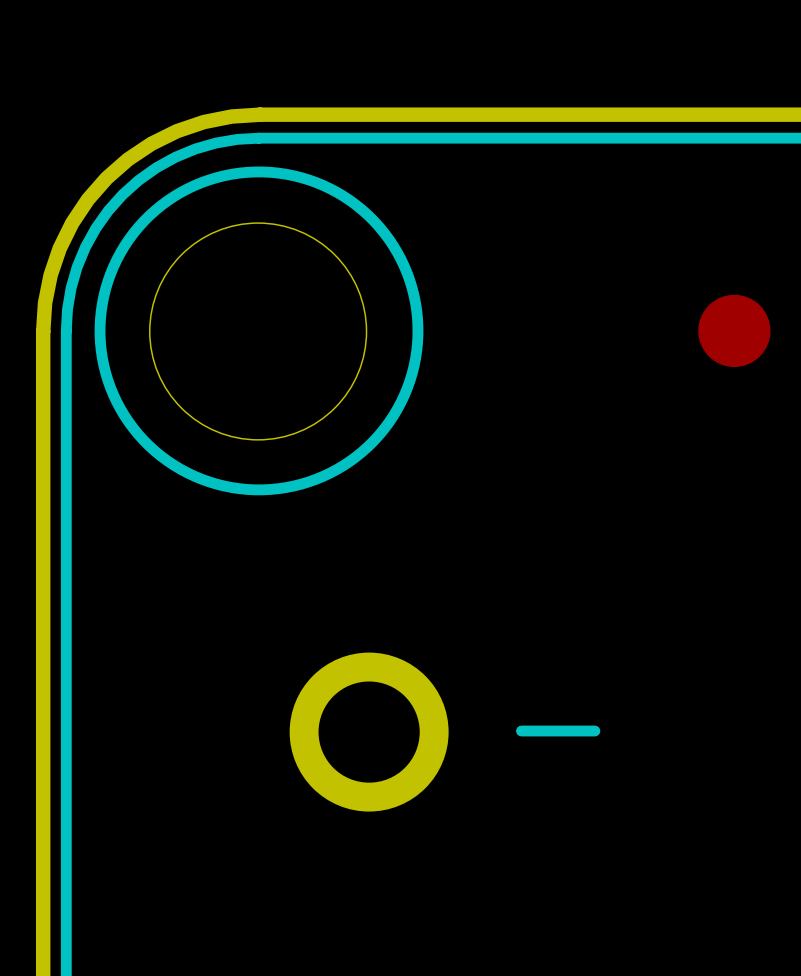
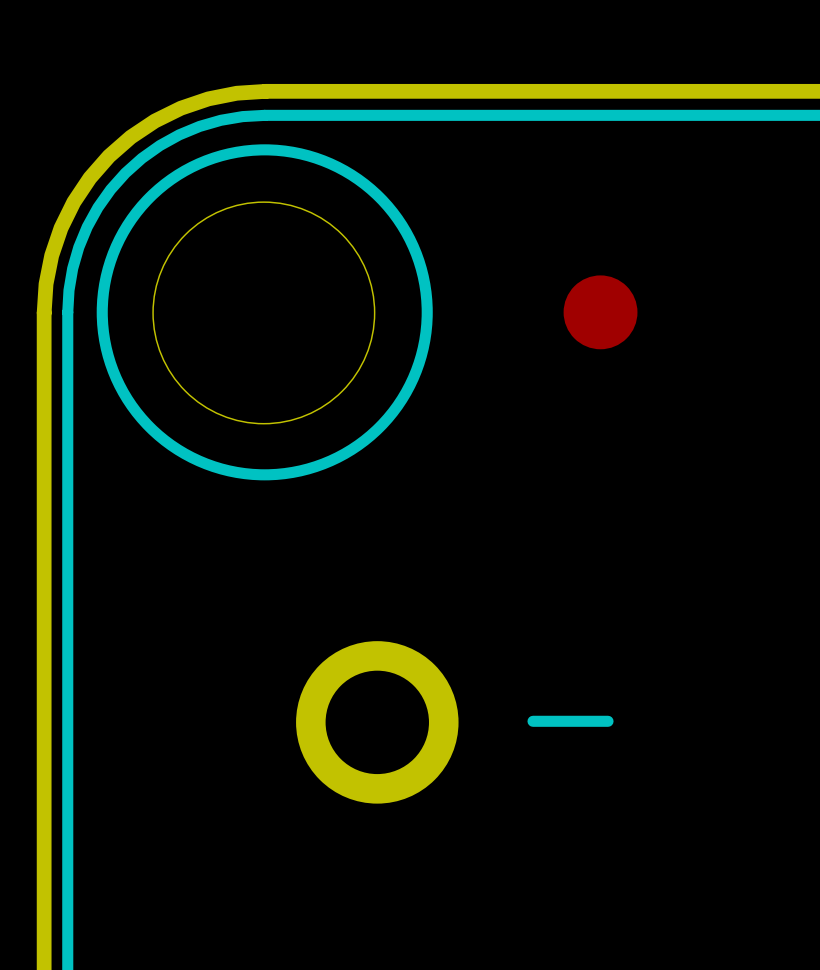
part position: (734, 330) -> (600, 312)

